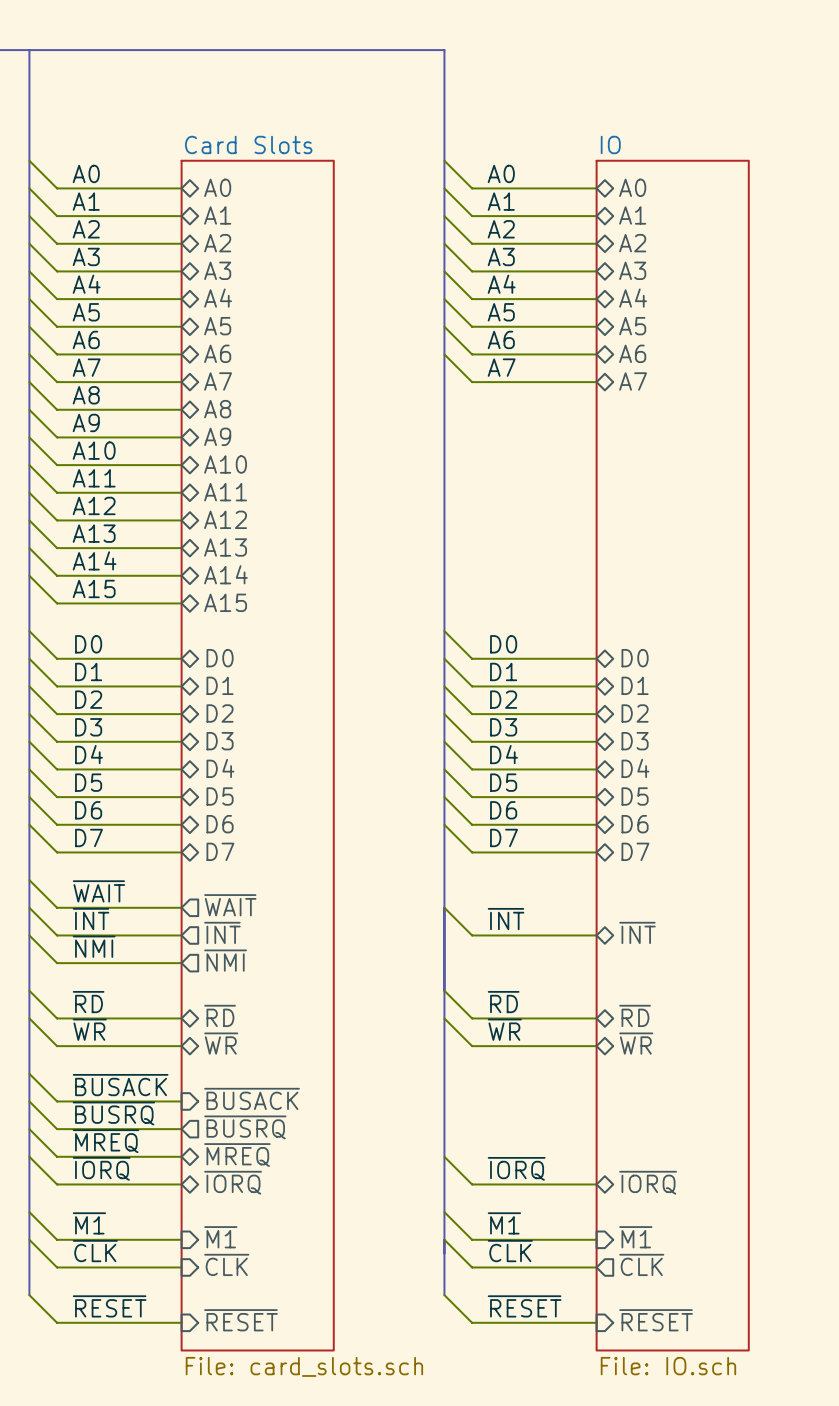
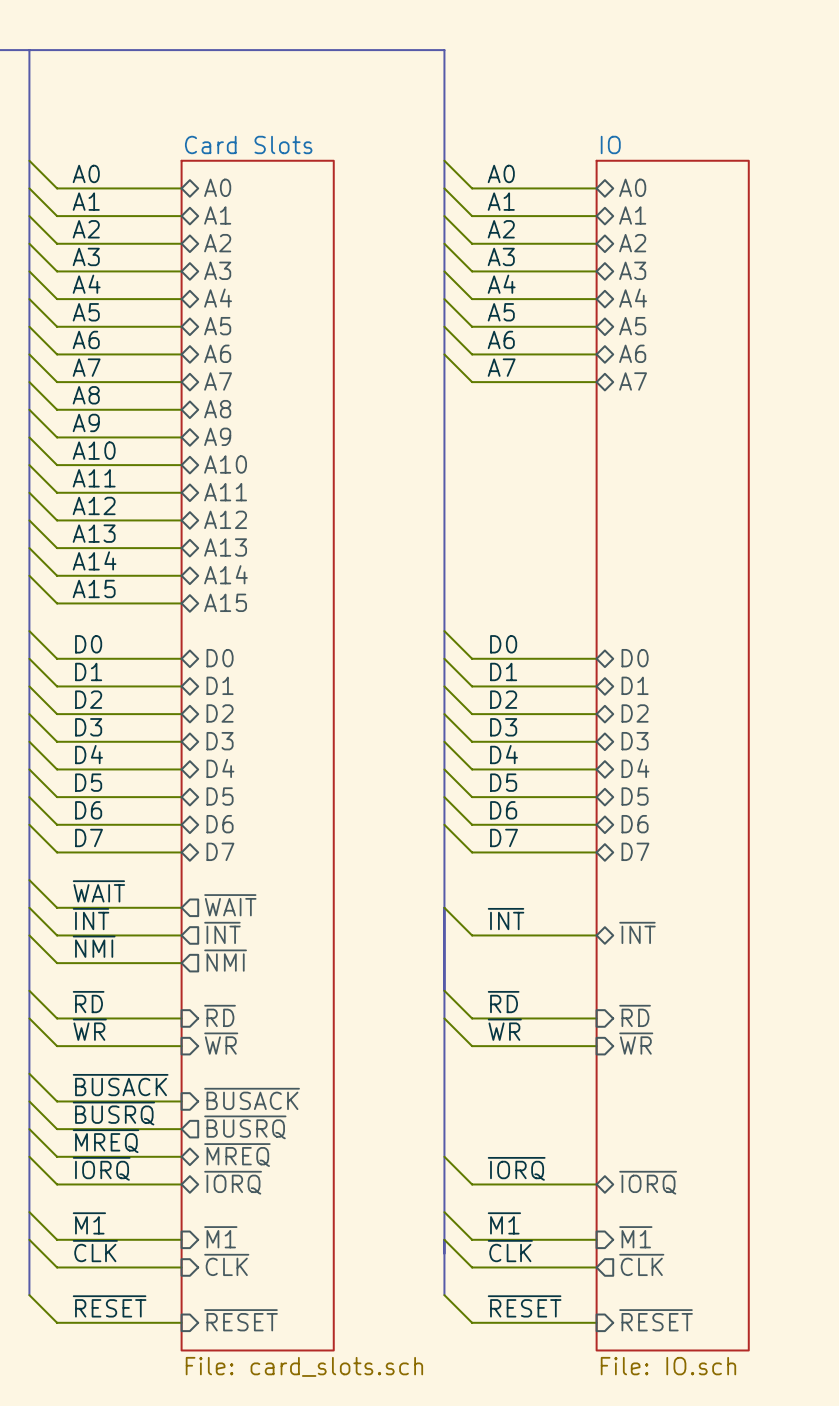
sheet pin shape: bidirectional (220, 1015) -> input (220, 1015)
sheet pin shape: bidirectional (635, 1015) -> input (635, 1015)
sheet pin shape: bidirectional (221, 1043) -> input (221, 1043)
sheet pin shape: bidirectional (636, 1043) -> input (636, 1043)

